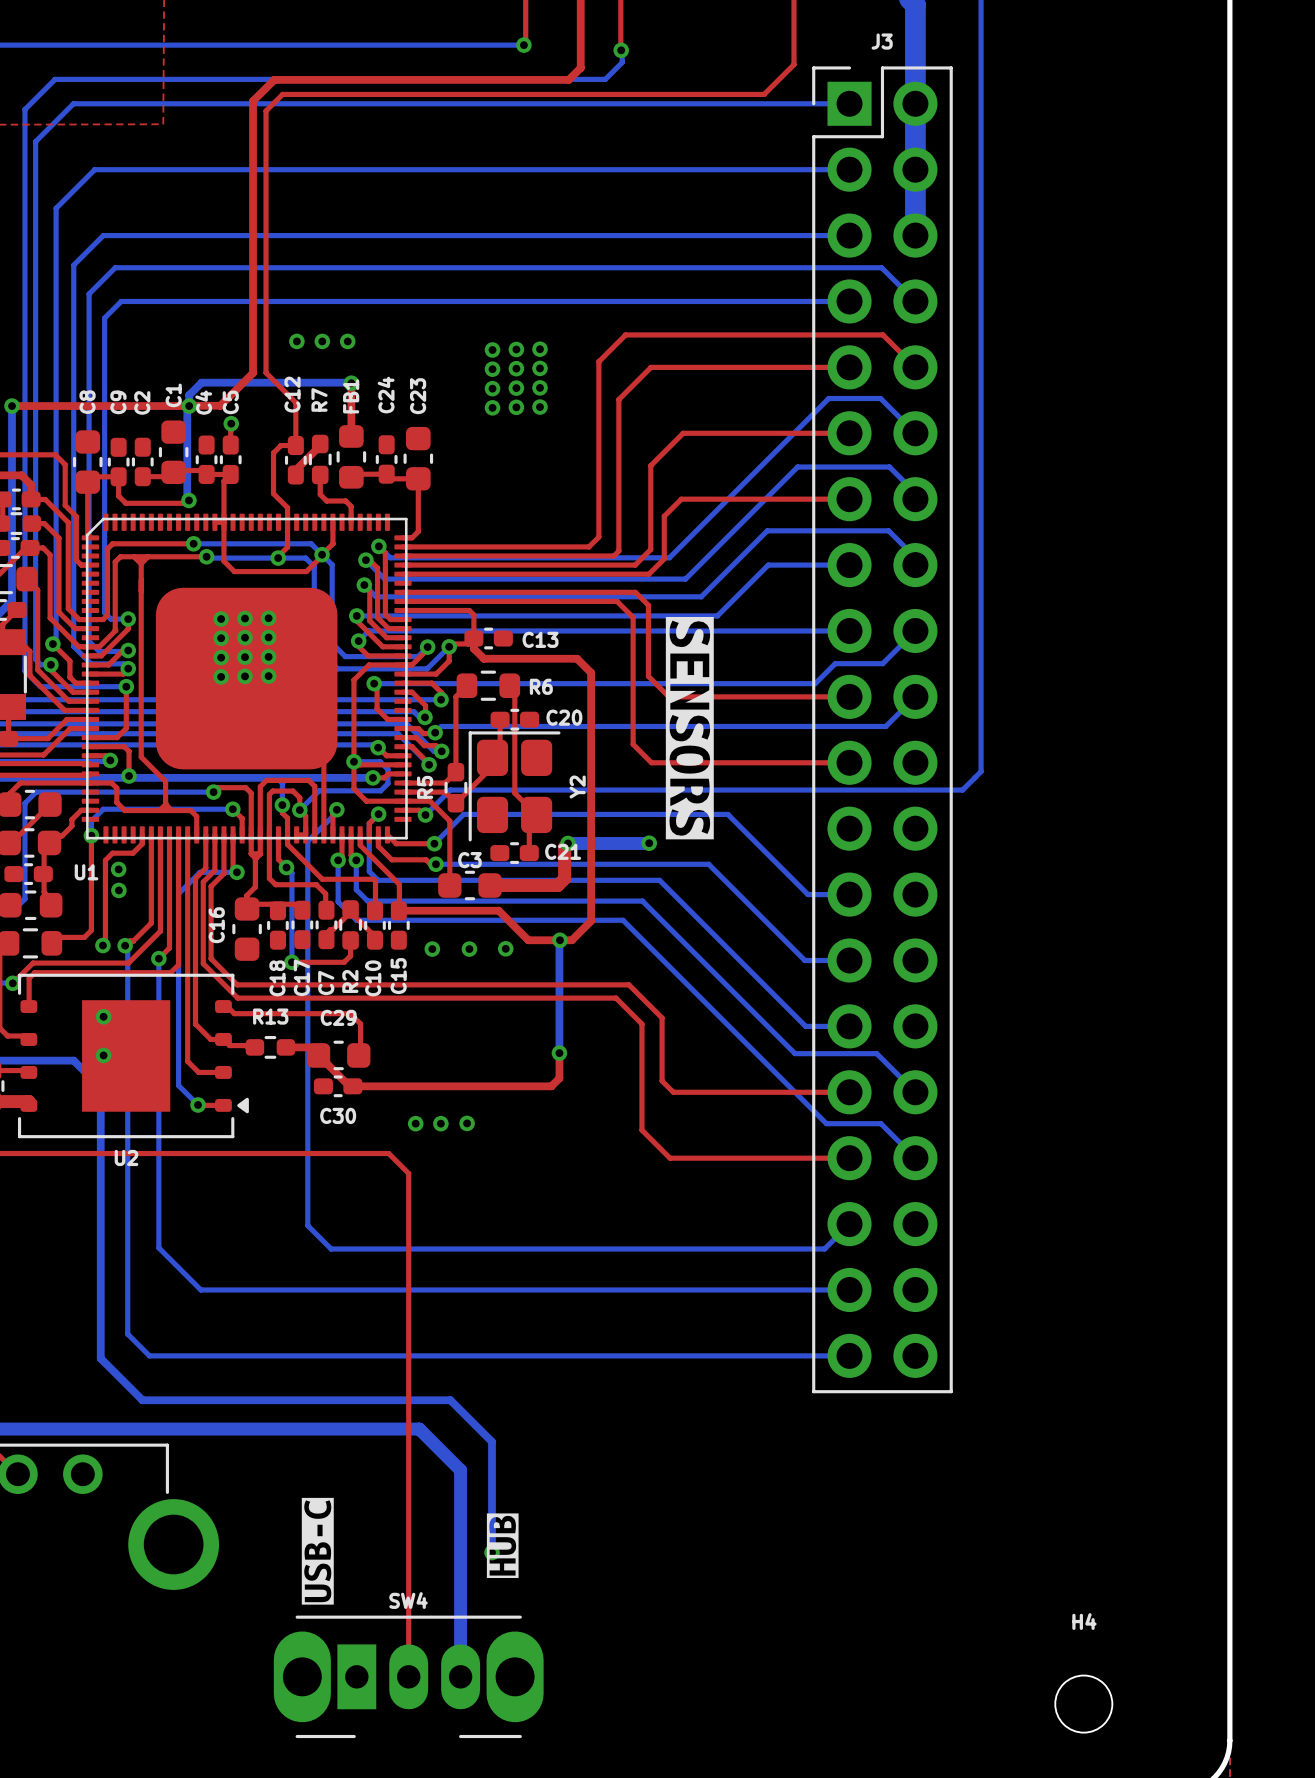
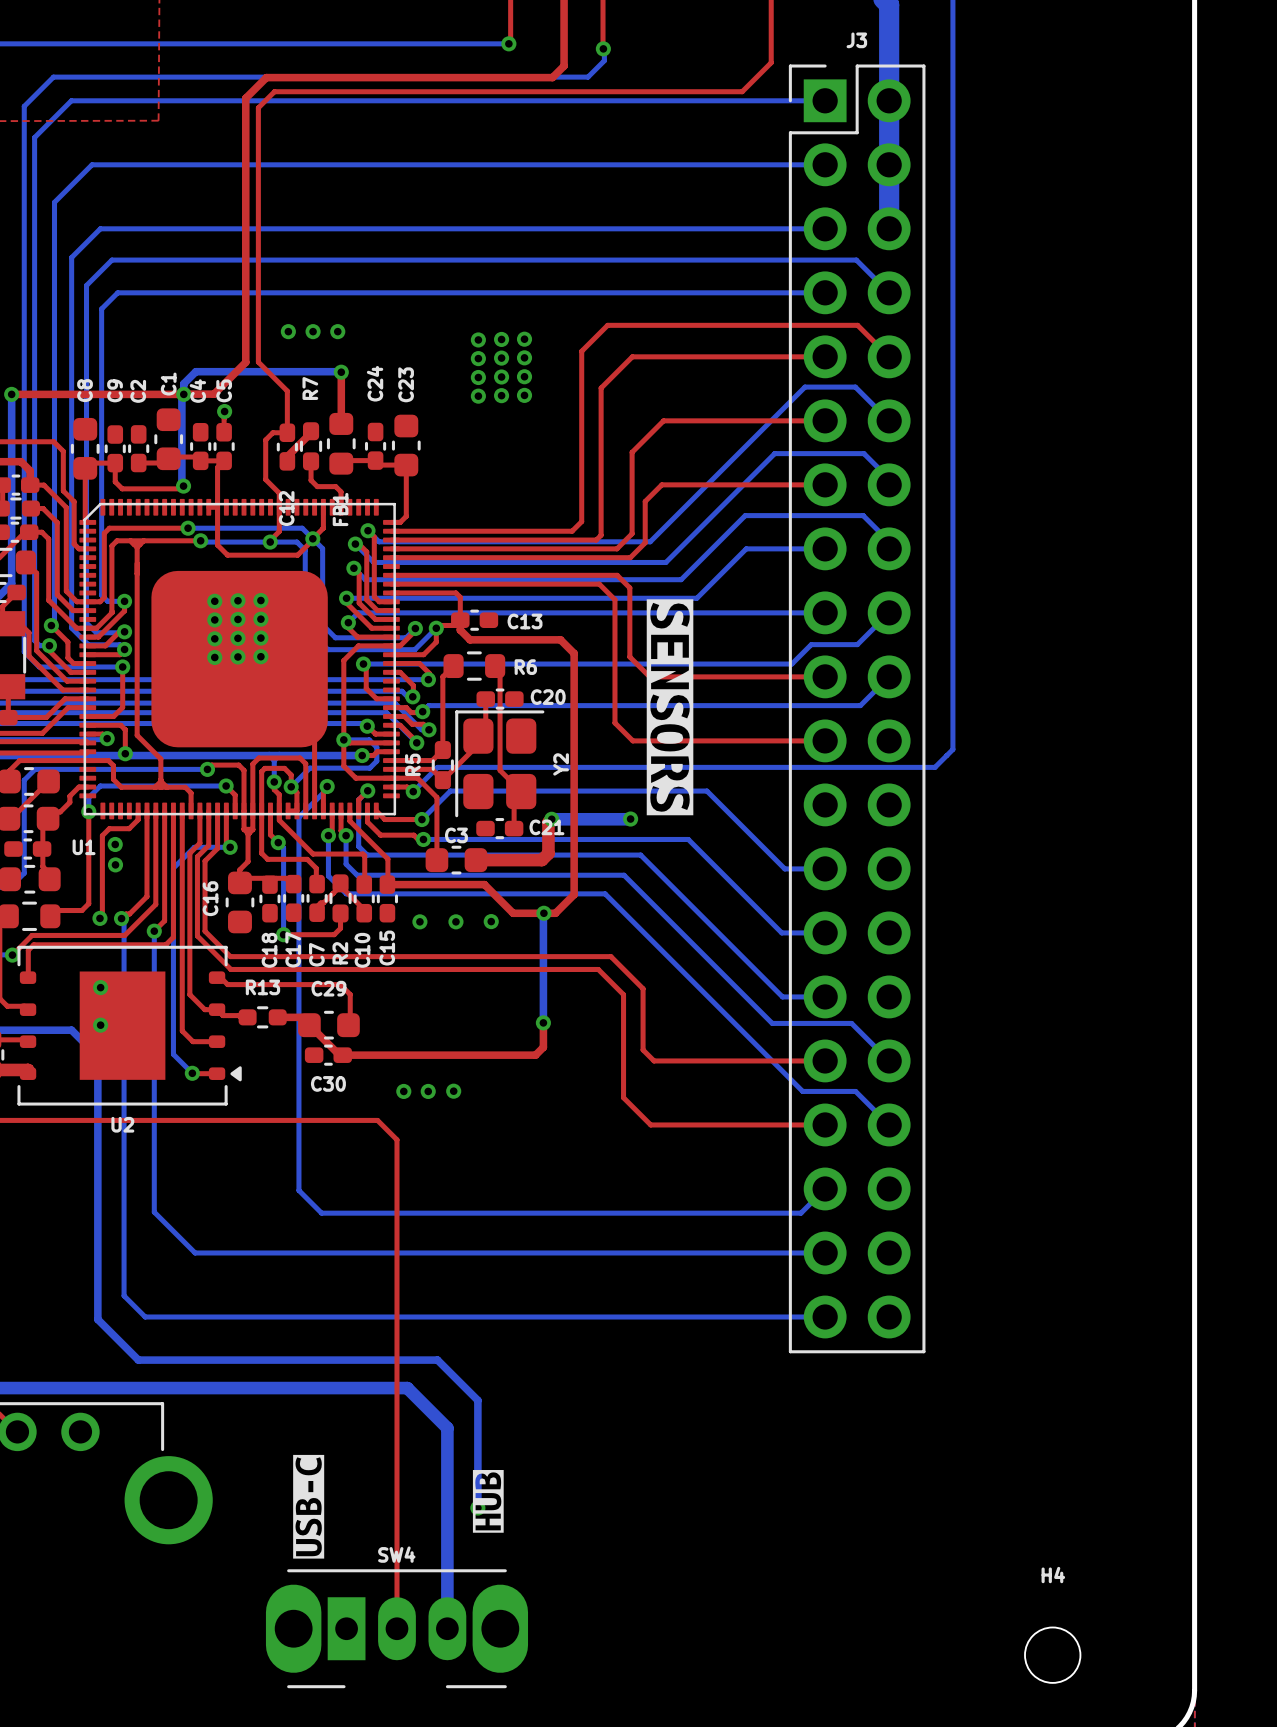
C12 name position: C12 (292, 394) -> C12 (286, 508)
FB1 name position: FB1 (351, 396) -> FB1 (340, 509)

